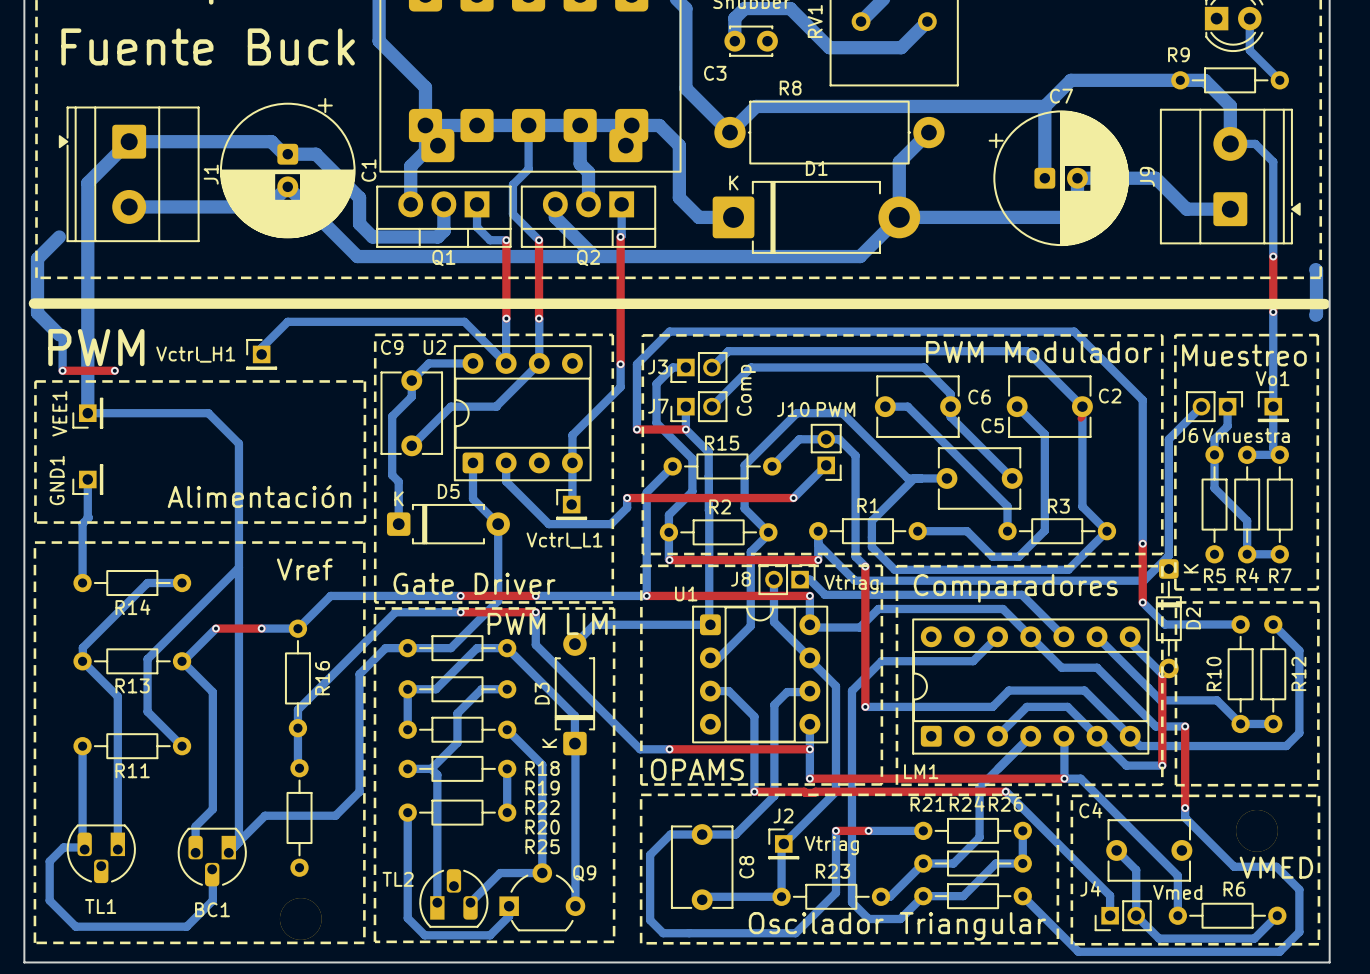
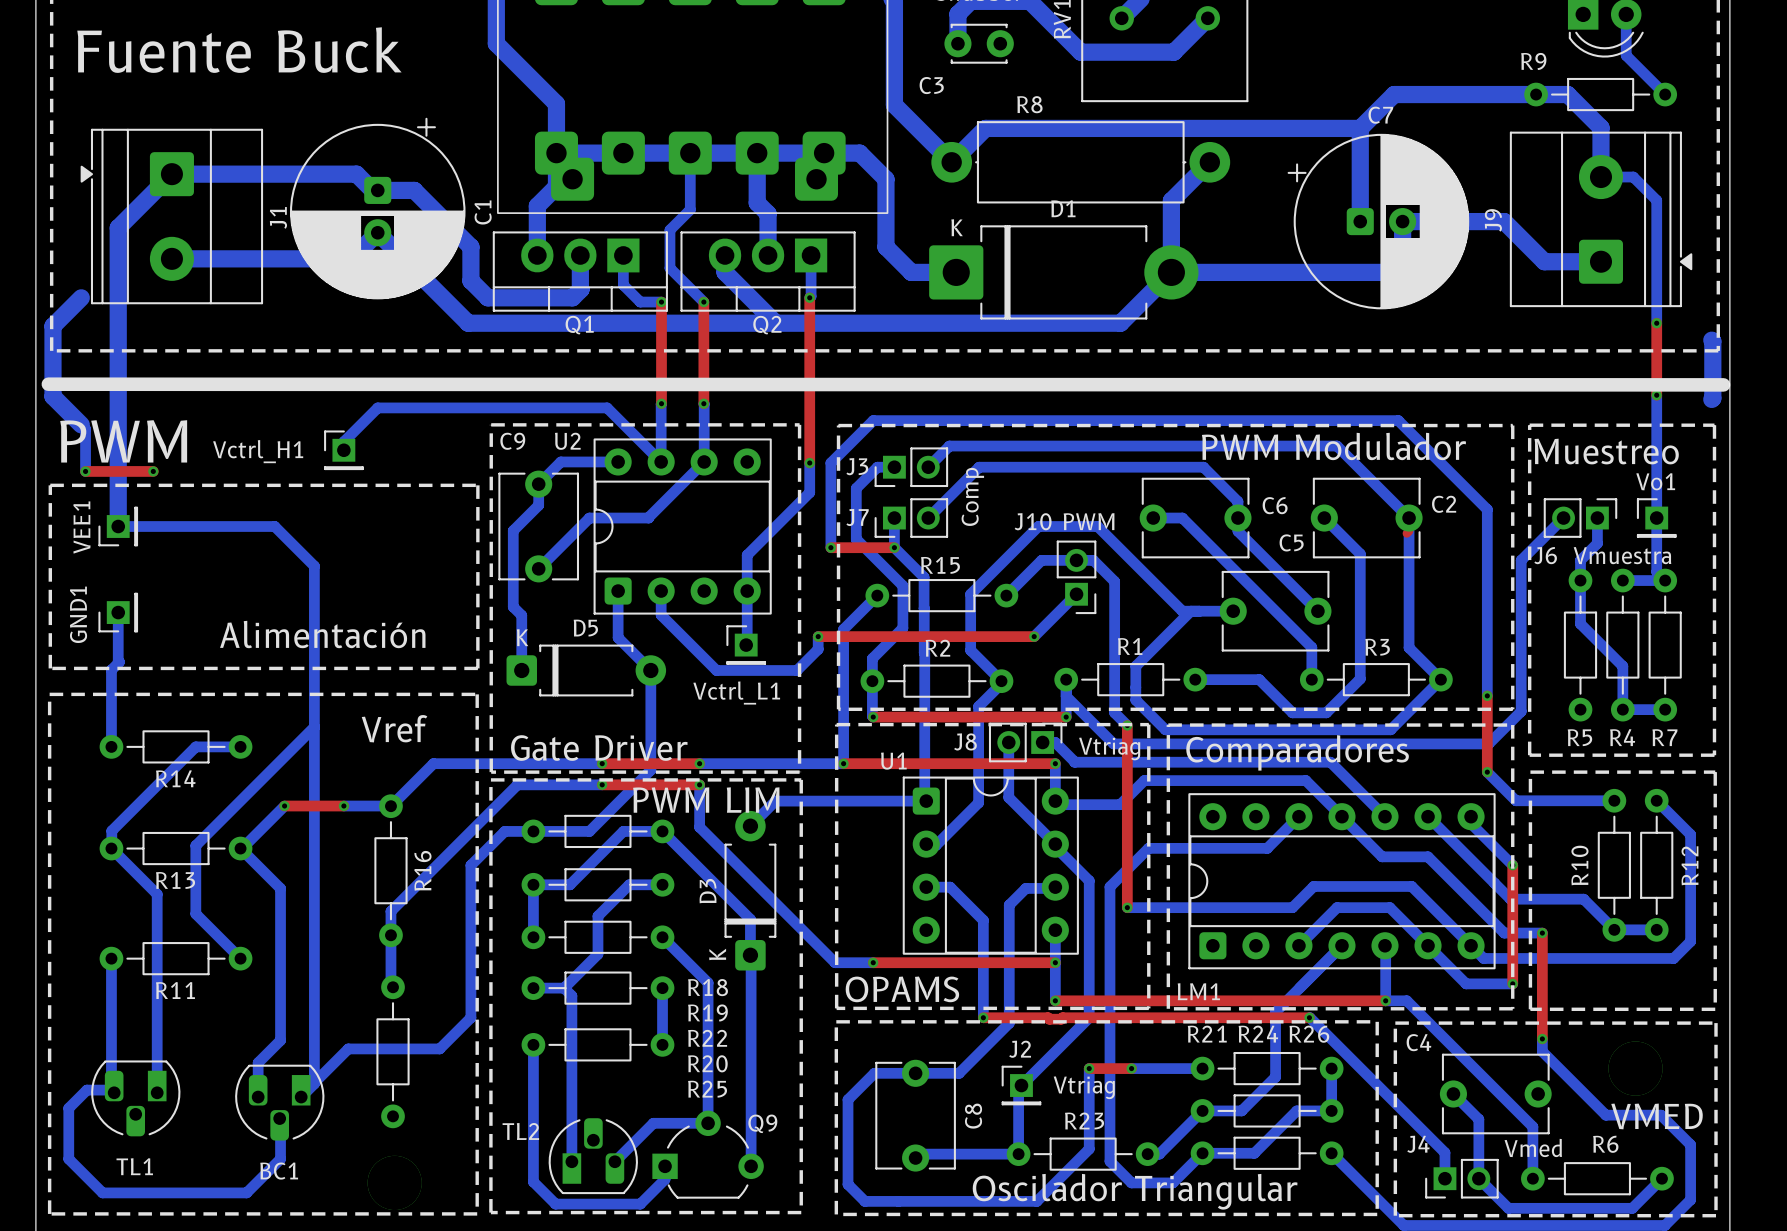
D2: (1168, 618) -> none

